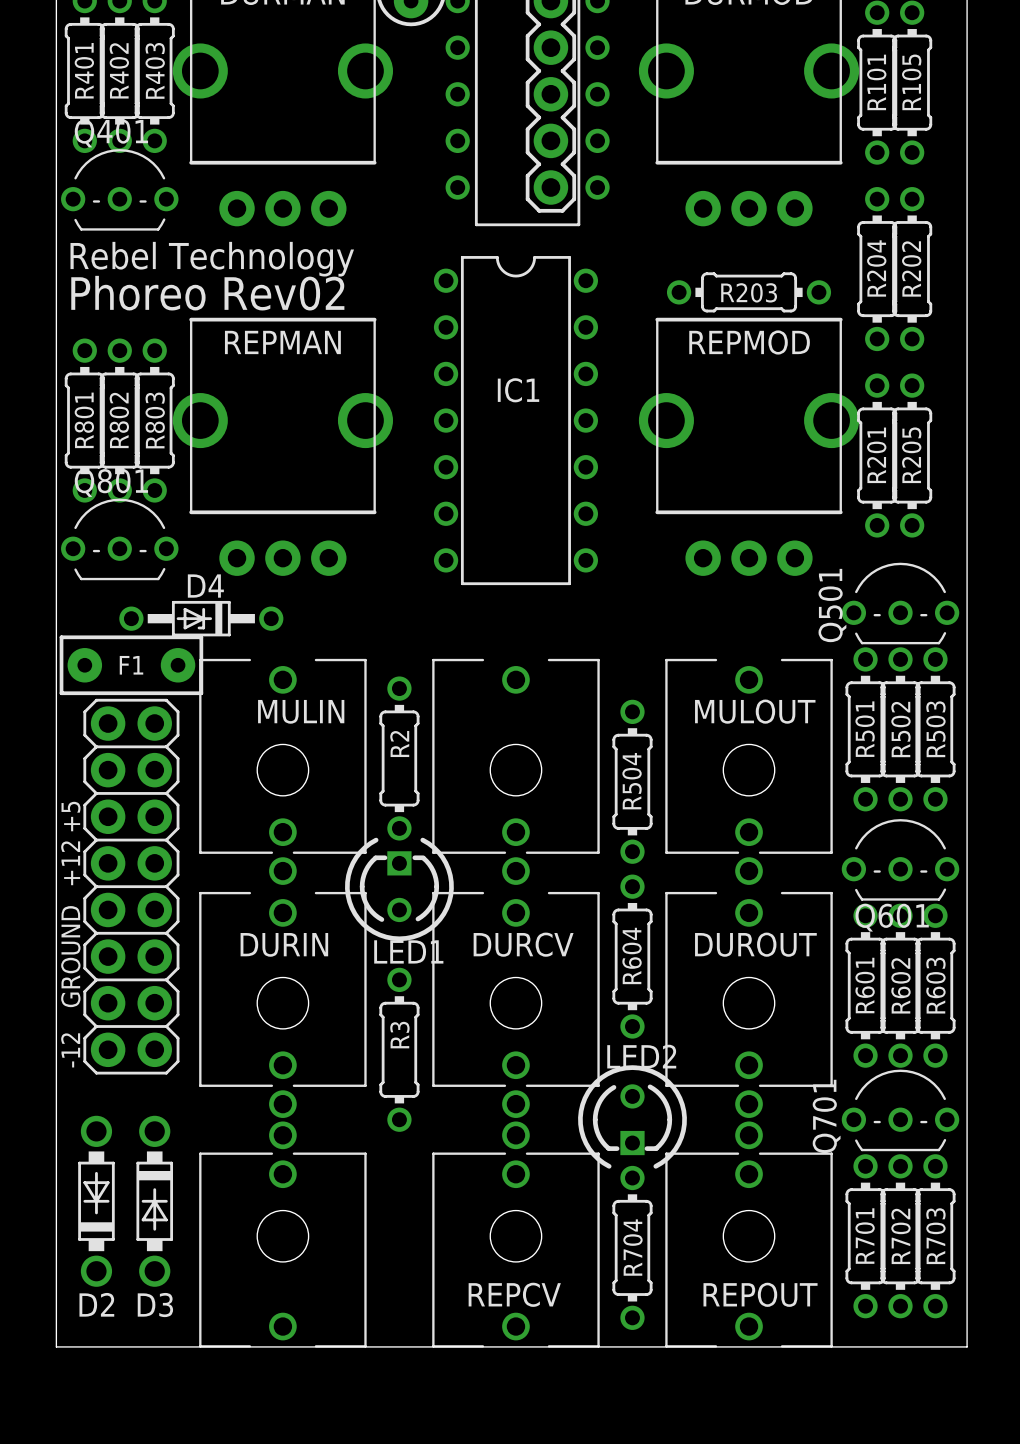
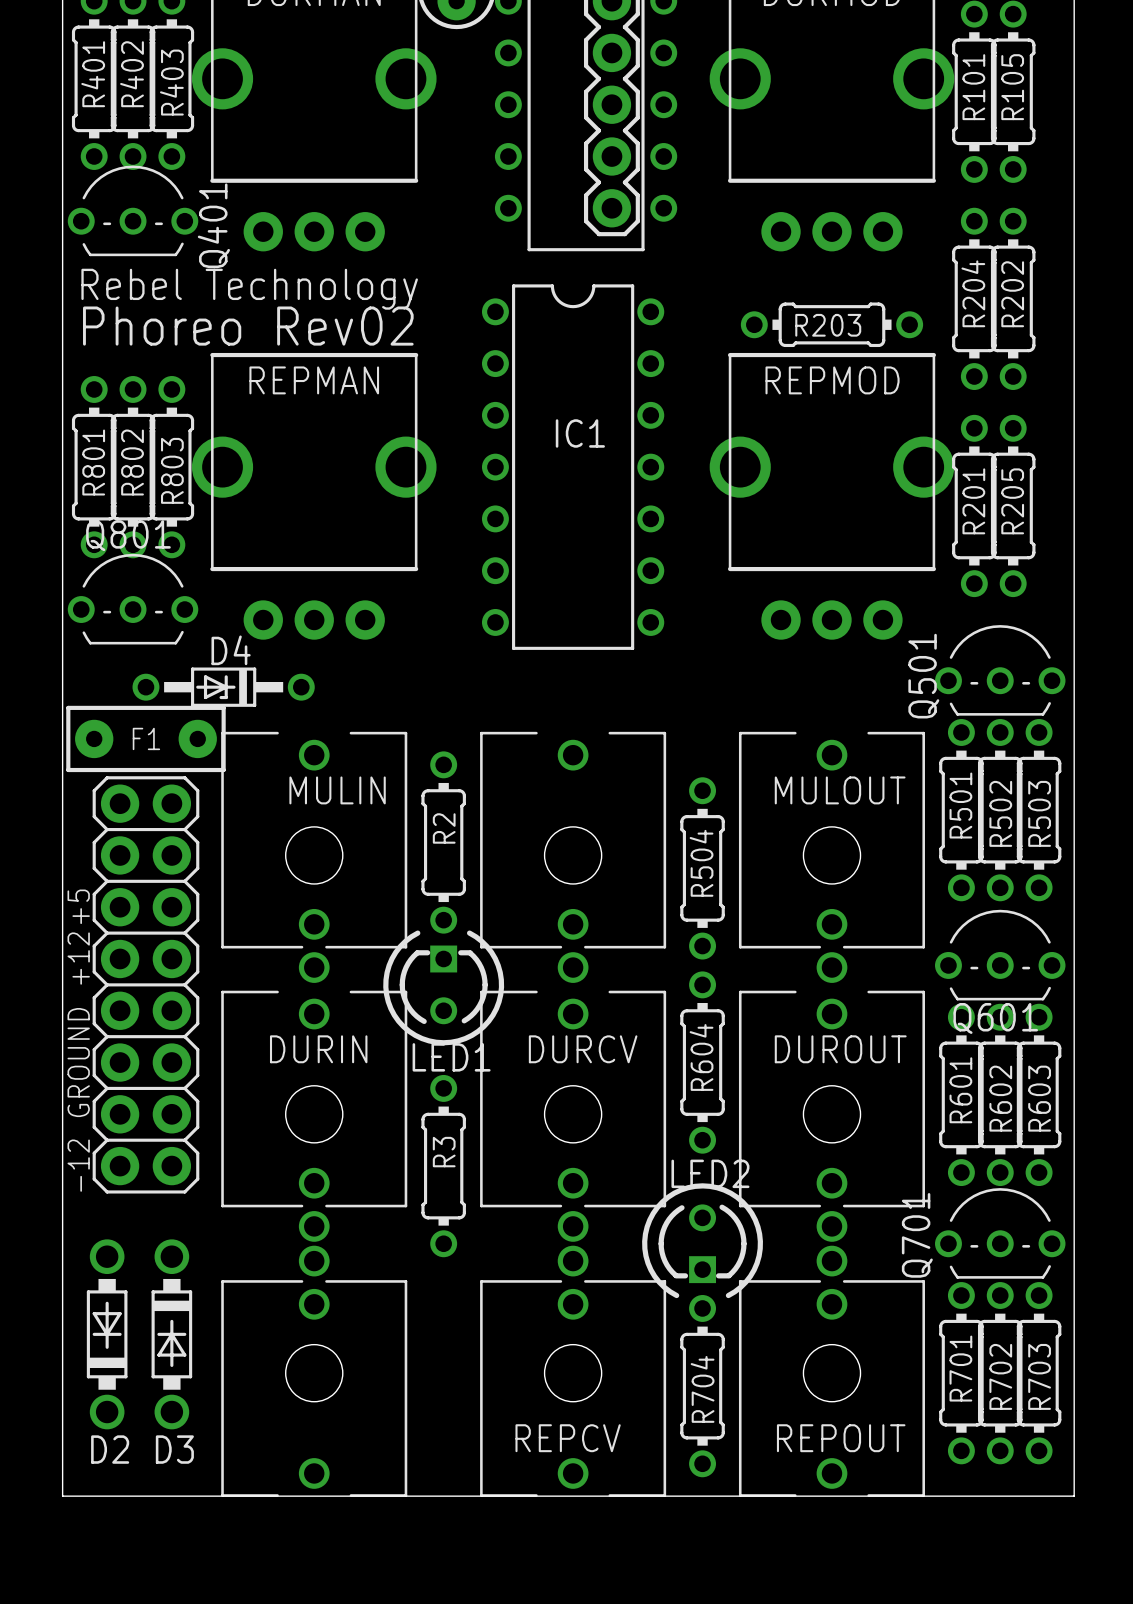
Q401 name rotation: 0° (111, 133) -> 90° counterclockwise (213, 225)
Q401 name position: Q401 (111, 133) -> Q401 (213, 225)

